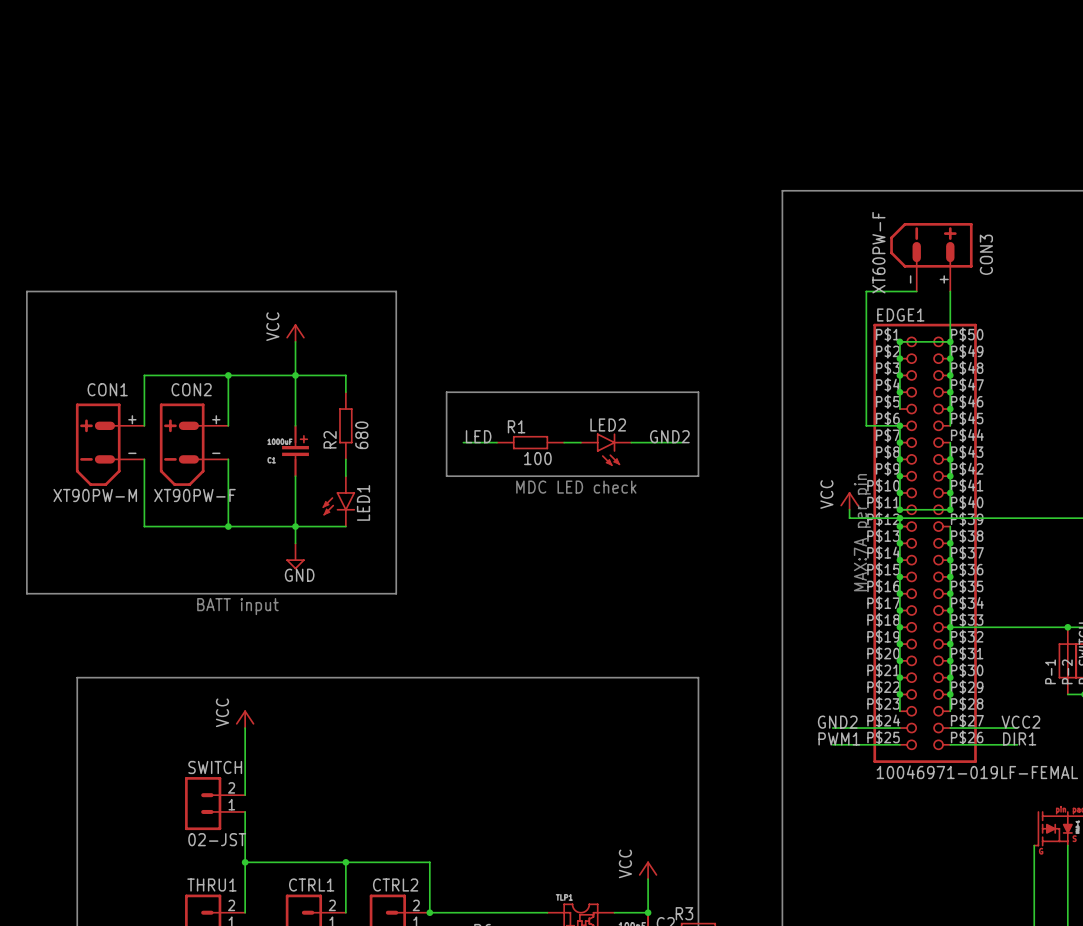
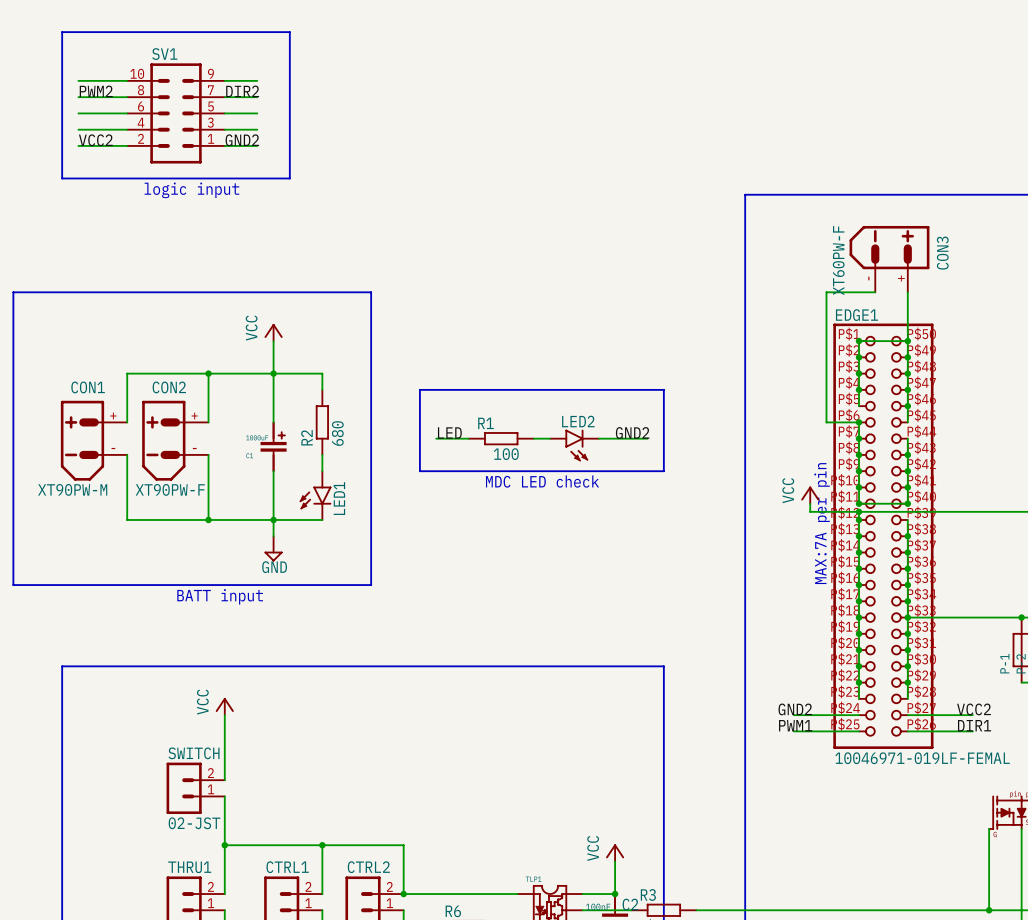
line: none -> (62, 32) (62, 178) (289, 178) (289, 32) (62, 32)
wire: none -> (78, 80) (127, 80)
wire: none -> (224, 80) (257, 80)
label: none -> PWM2 (96, 91)
label: none -> DIR2 (242, 91)
wire: none -> (78, 97) (127, 97)
wire: none -> (224, 97) (257, 97)
wire: none -> (78, 113) (127, 113)
SV1: none -> (176, 113)
wire: none -> (224, 113) (257, 113)
wire: none -> (78, 129) (127, 129)
wire: none -> (224, 129) (257, 129)
label: none -> VCC2 (95, 140)
label: none -> GND2 (242, 140)
wire: none -> (78, 145) (127, 145)
wire: none -> (224, 145) (257, 145)
text: none -> logic input (191, 190)

